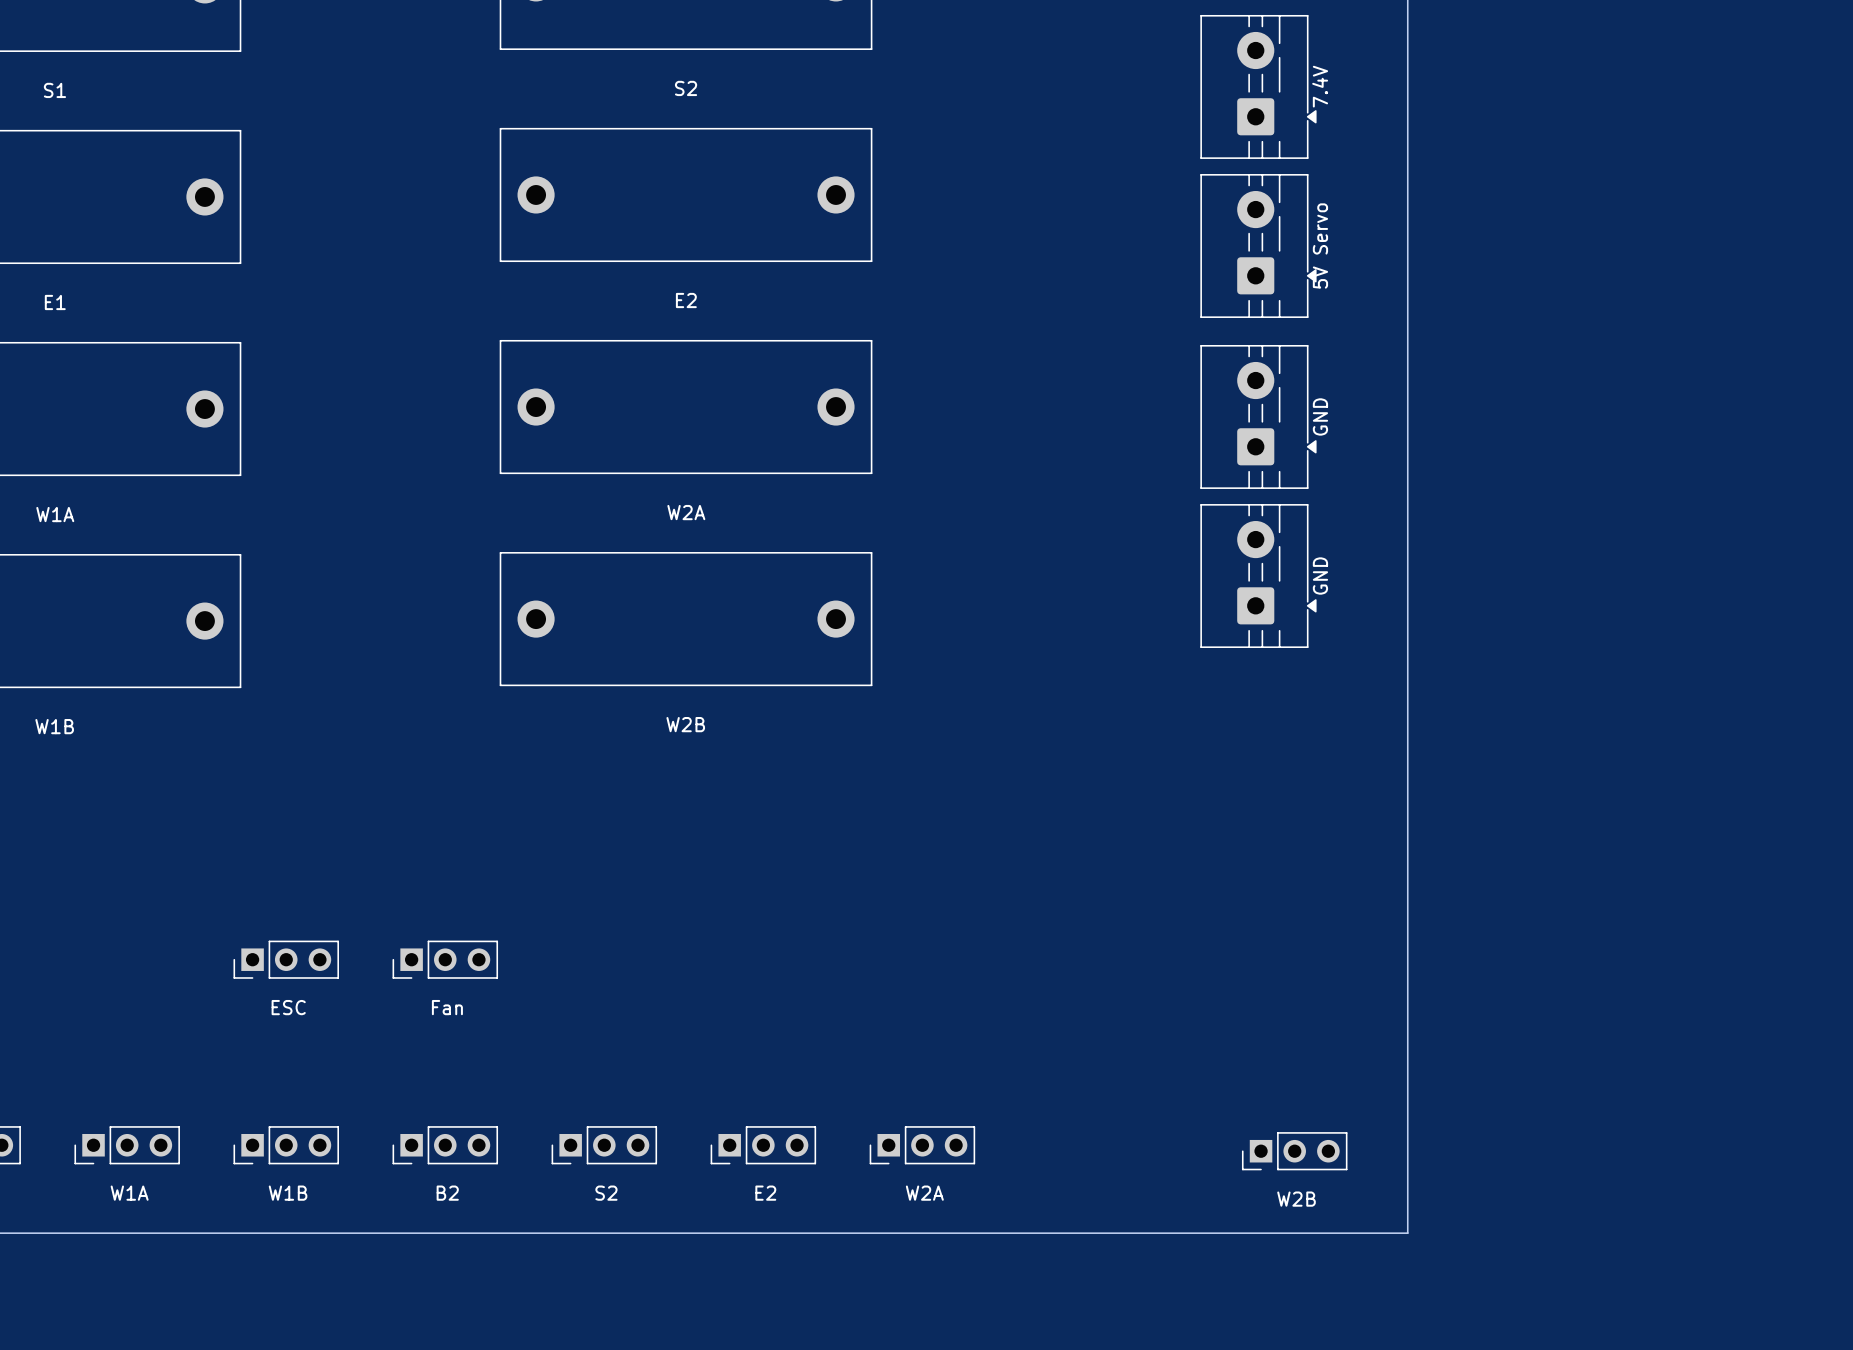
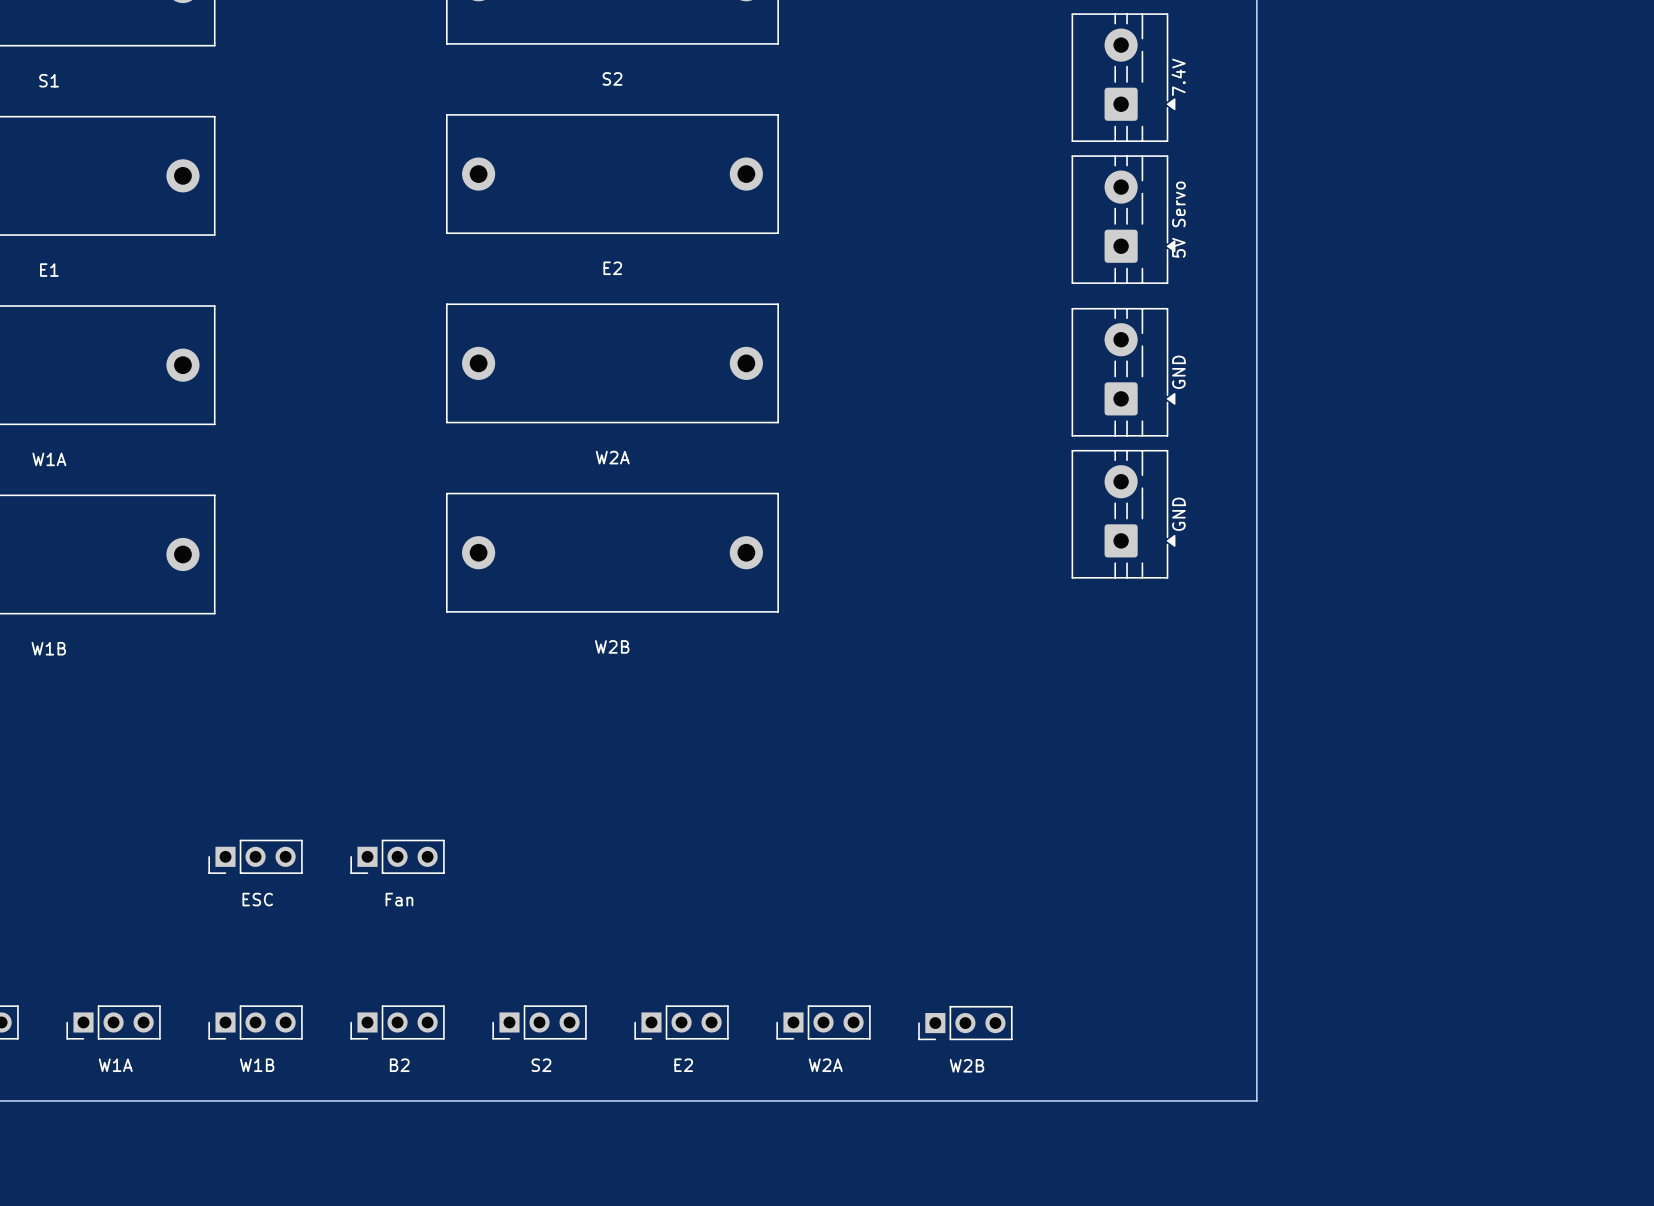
part position: (1294, 1151) -> (965, 1023)

